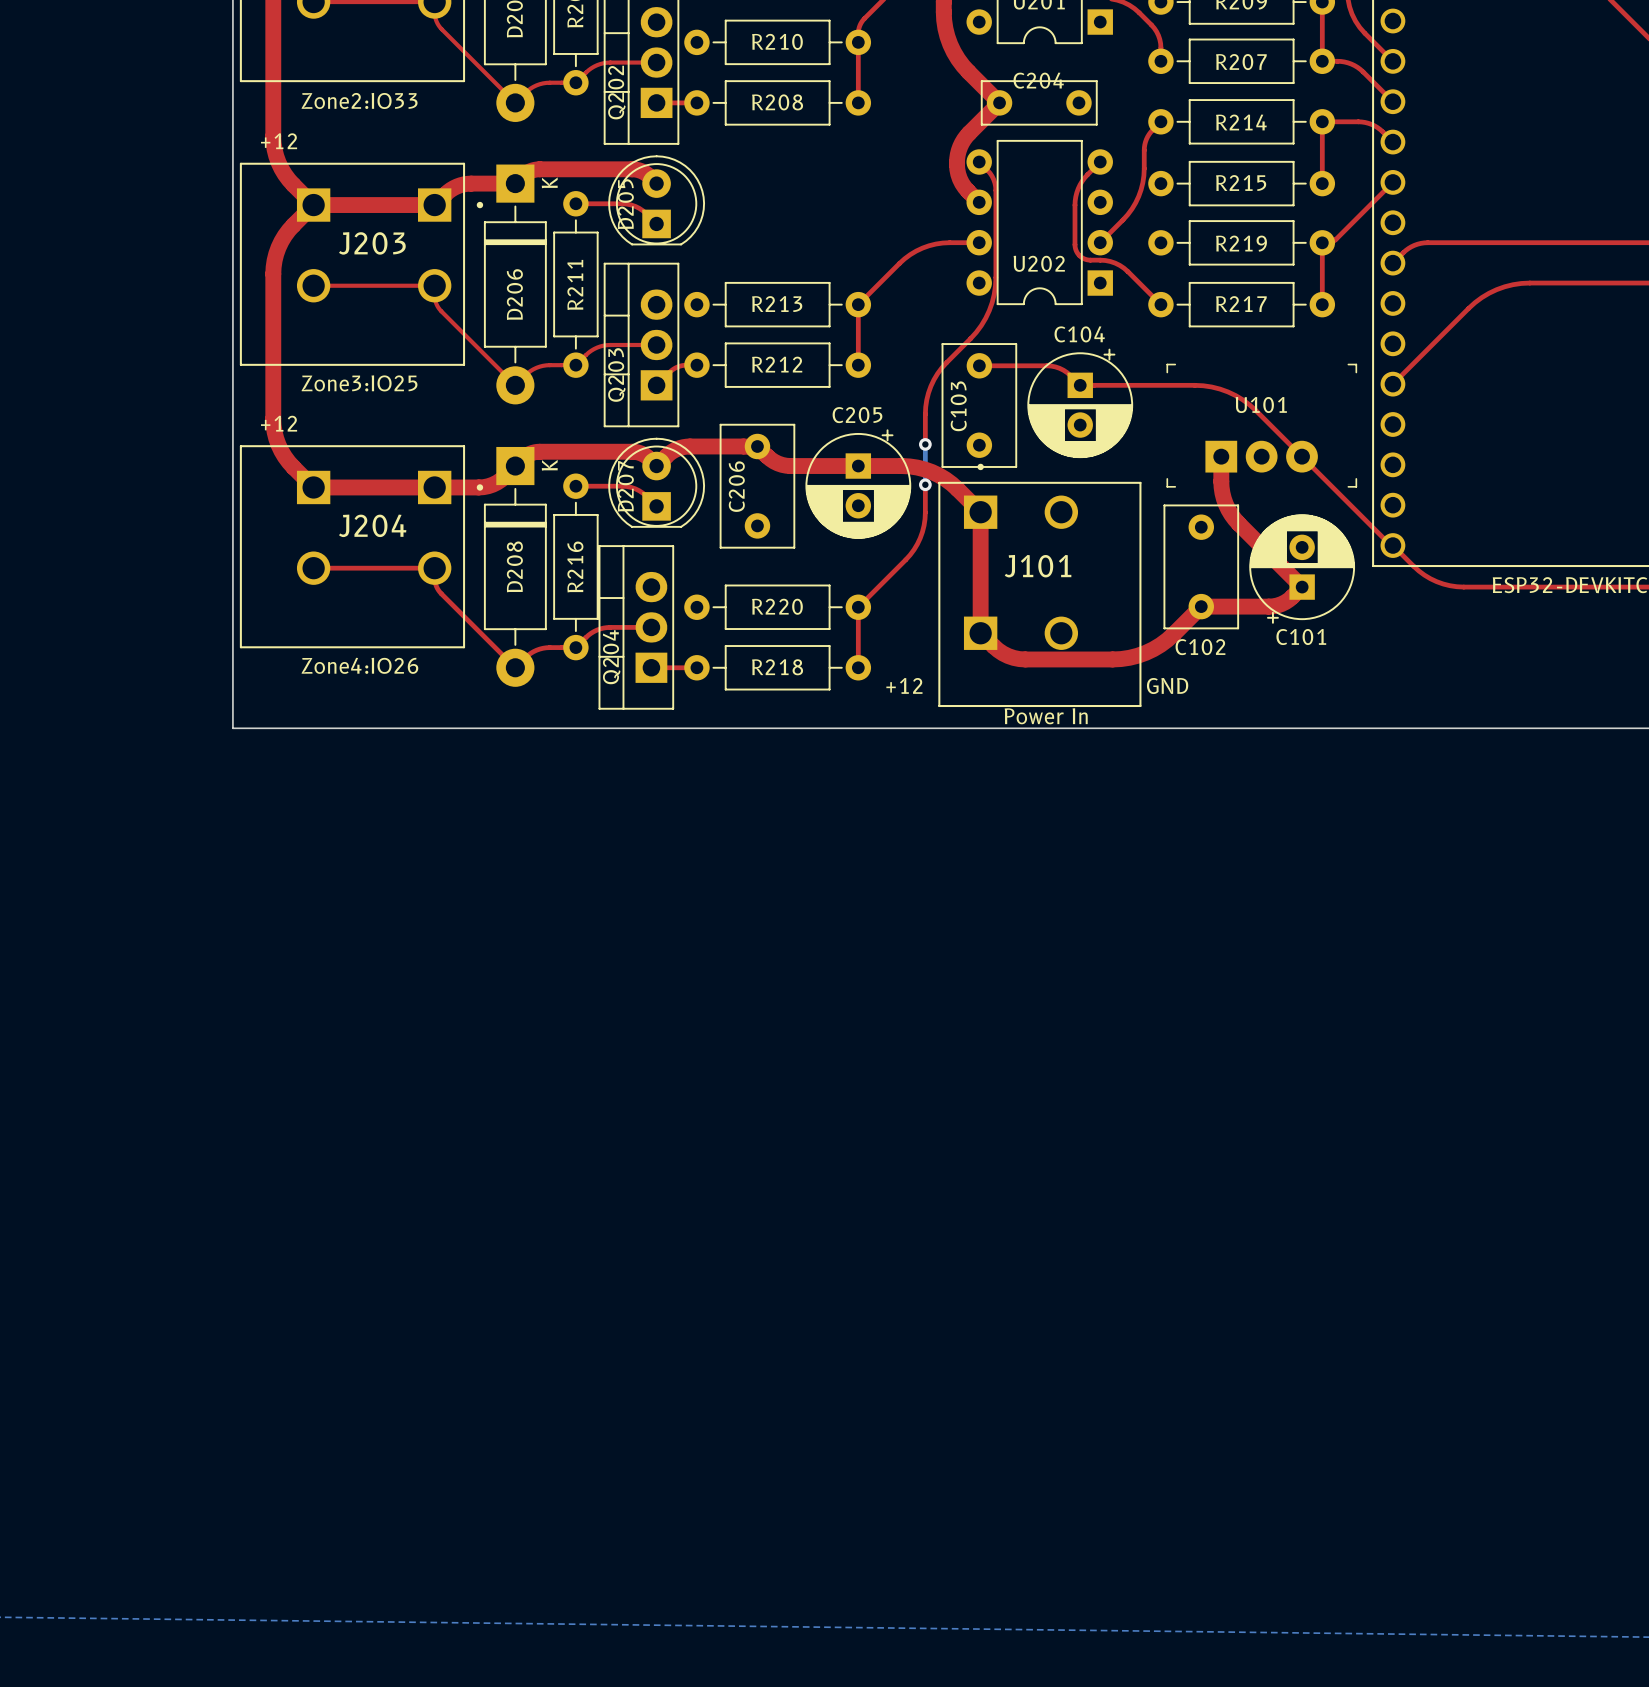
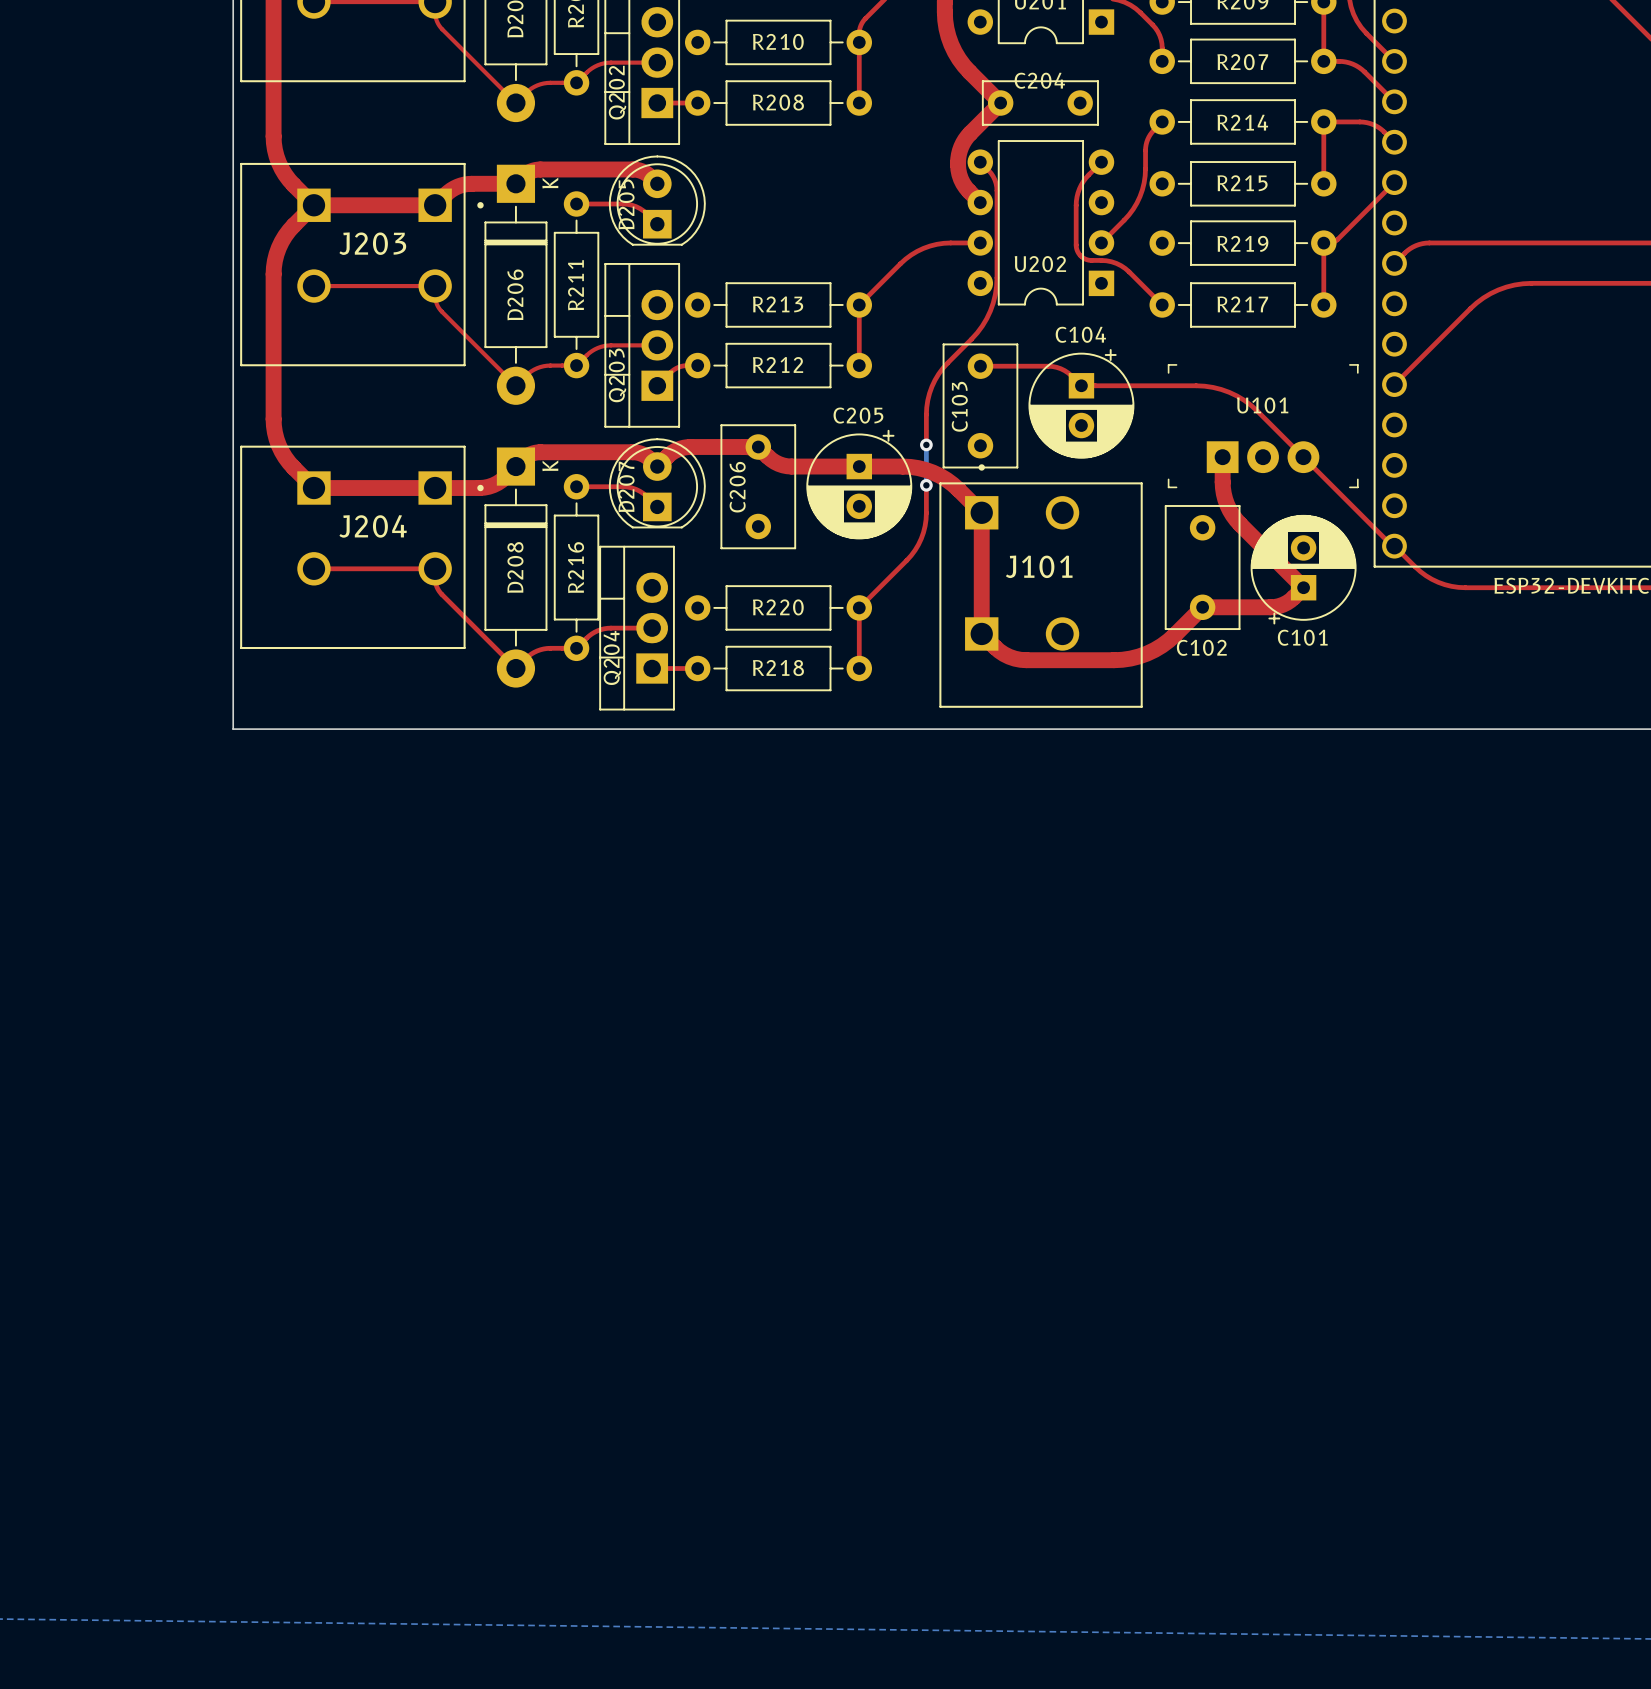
text: Zone2:IO33 (359, 100) -> none
text: +12 (279, 141) -> none
text: Zone3:IO25 (359, 383) -> none
text: +12 (279, 423) -> none
text: Zone4:IO26 (359, 665) -> none
text: +12 (904, 685) -> none
text: GND (1167, 686) -> none
text: Power In (1046, 716) -> none

